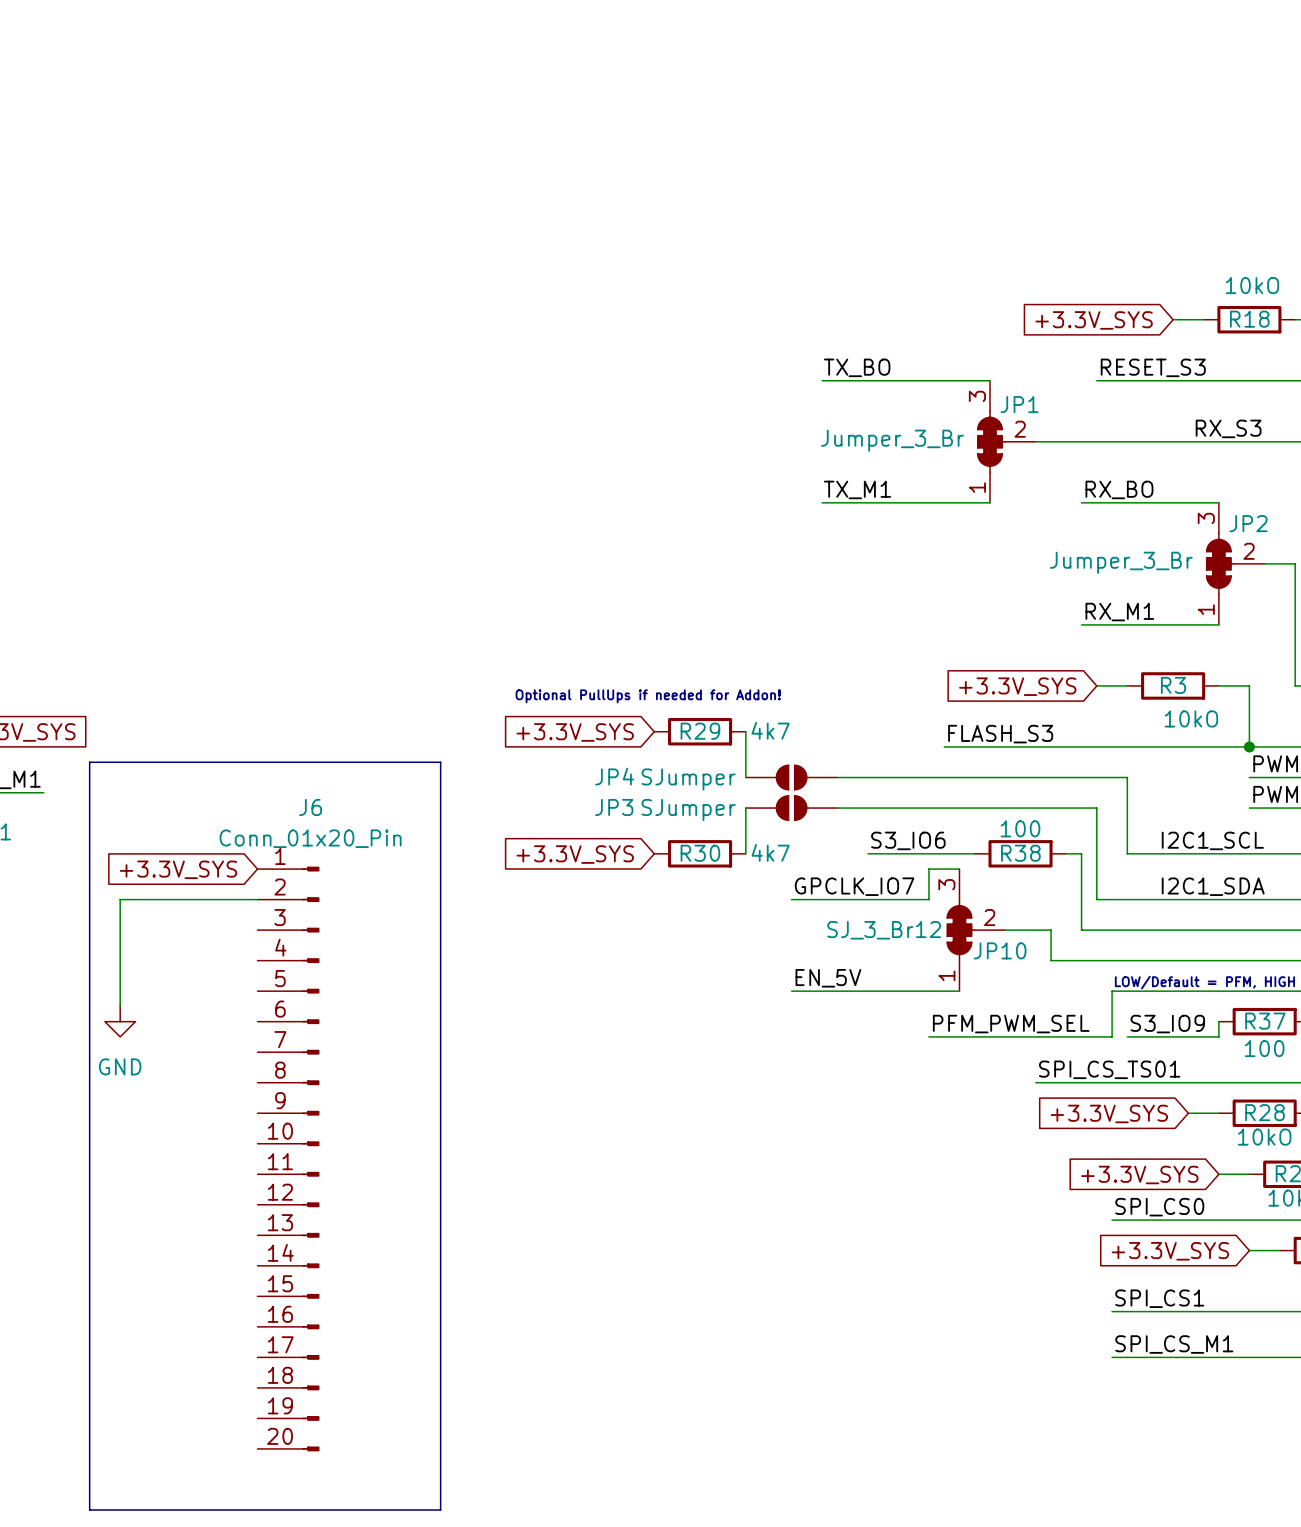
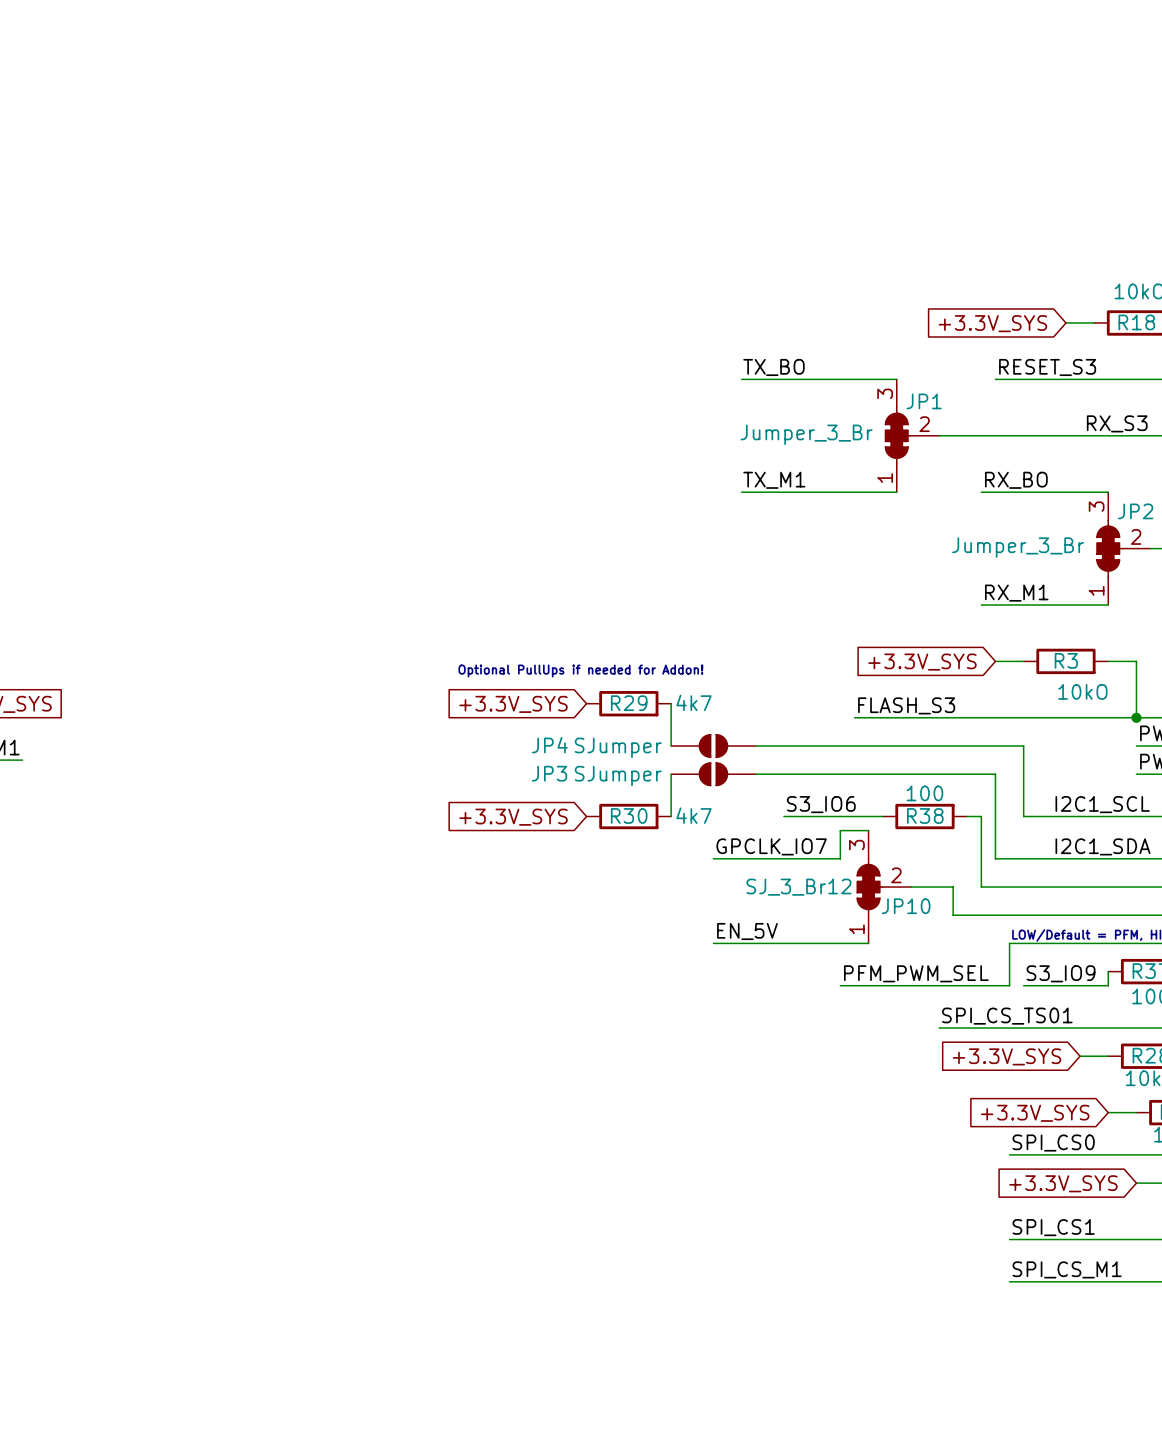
line: (89, 762) (440, 762) (440, 1509) (89, 1509) (89, 762) -> none
global label: +3.3V_SYS (178, 869) -> none
wire: (257, 899) (120, 899) (120, 1006) -> none
power symbol: GND (120, 1021) -> none
J6: Conn_01x20_Pin (288, 1159) -> none

